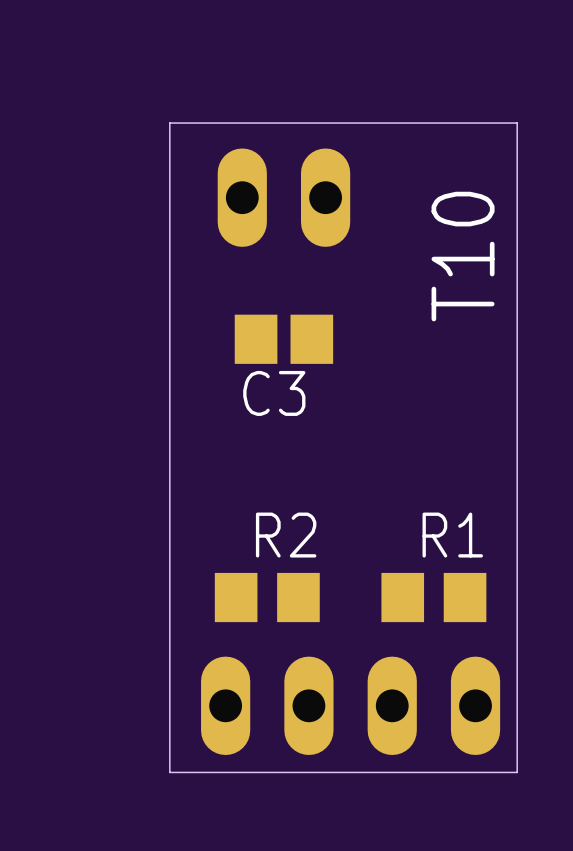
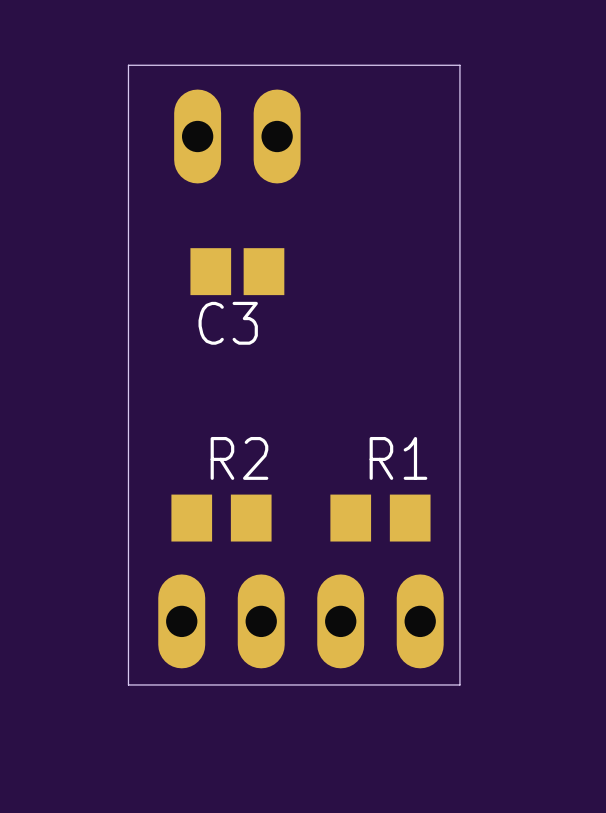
text: T10 (463, 256) -> none

